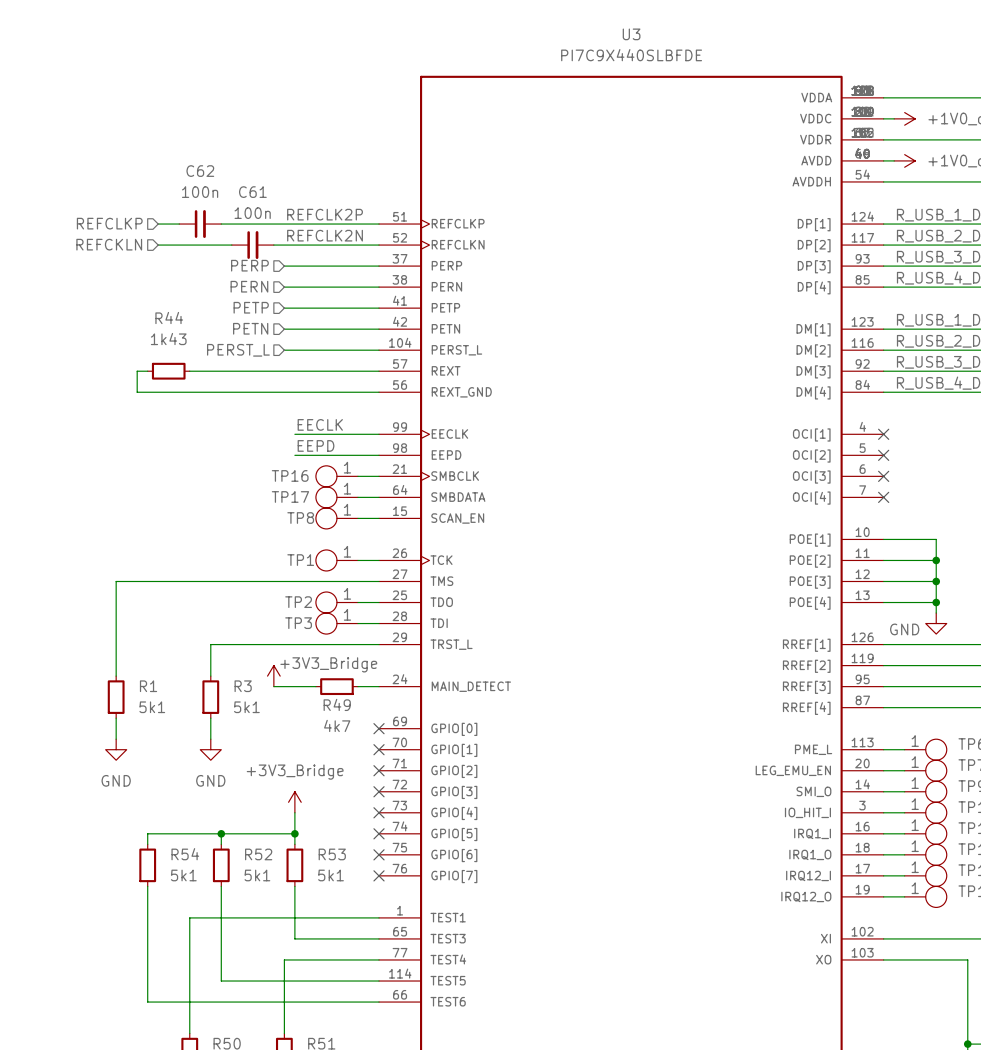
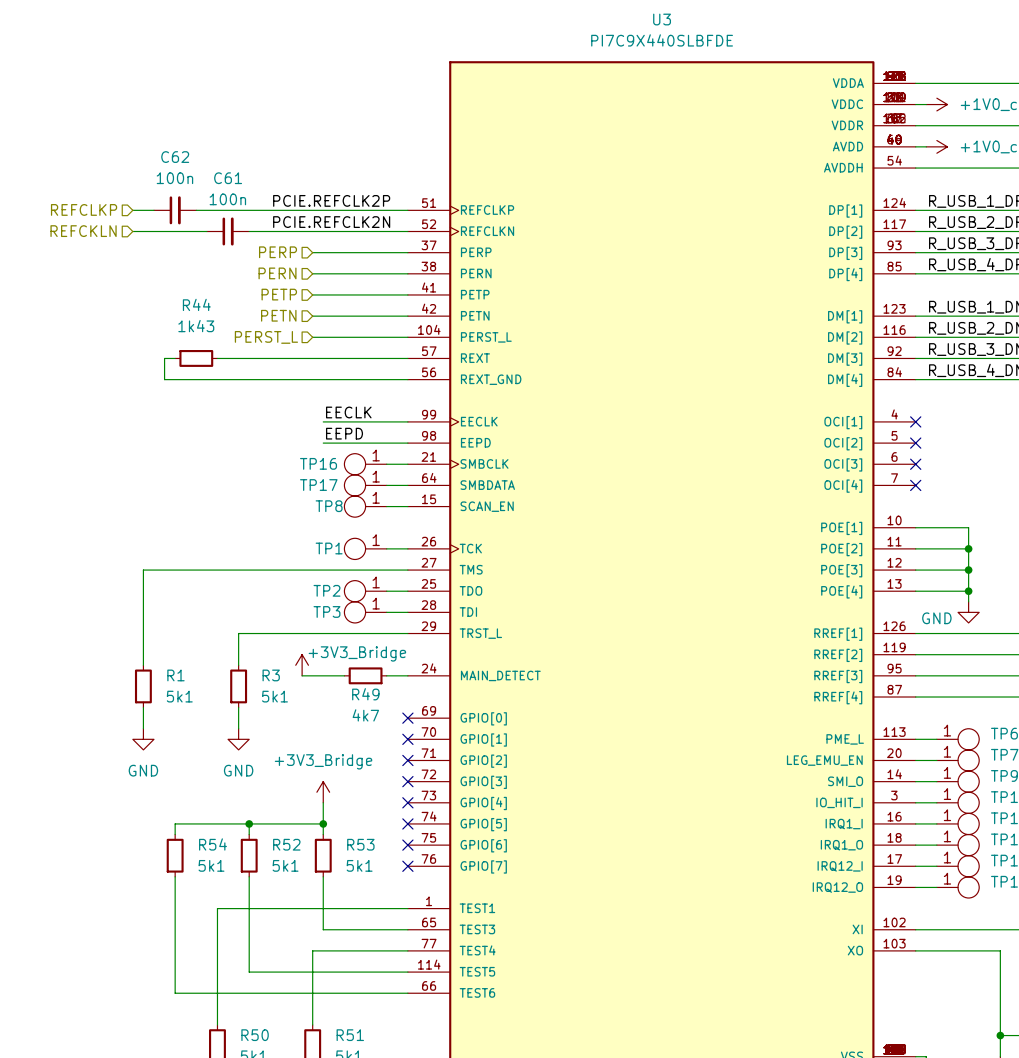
label: none -> PCIE.REFCLK2P (331, 200)
label: REFCLK2P (325, 214) -> none
hierarchical label position: REFCLKP (109, 223) -> REFCLKP (84, 209)
wire: none -> (132, 210) (153, 210)
C62 position: (200, 224) -> (175, 210)
label: none -> PCIE.REFCLK2N (331, 222)
label: REFCLK2N (325, 235) -> none
hierarchical label position: REFCKLN (109, 244) -> REFCKLN (83, 231)
wire: none -> (132, 231) (185, 231)
C61 position: (252, 245) -> (228, 231)

